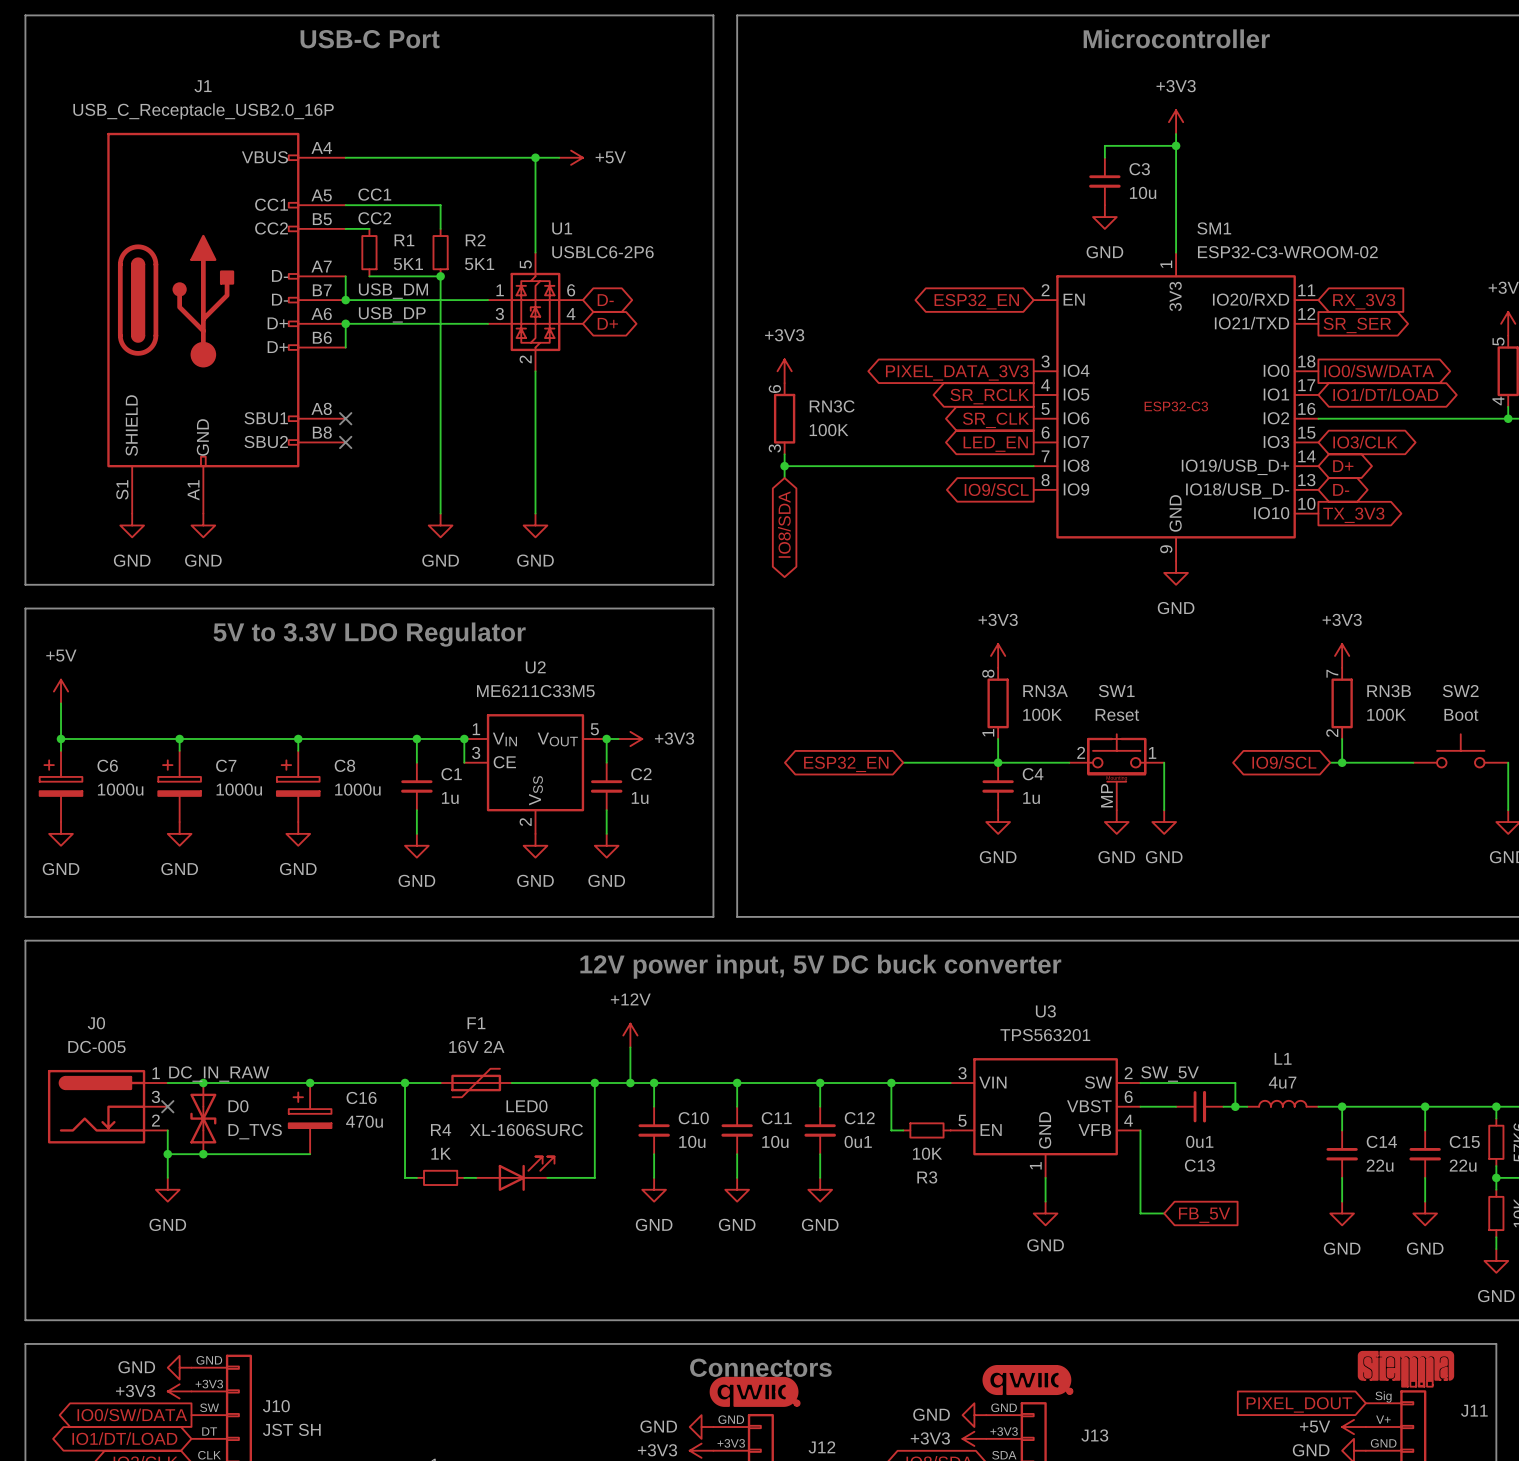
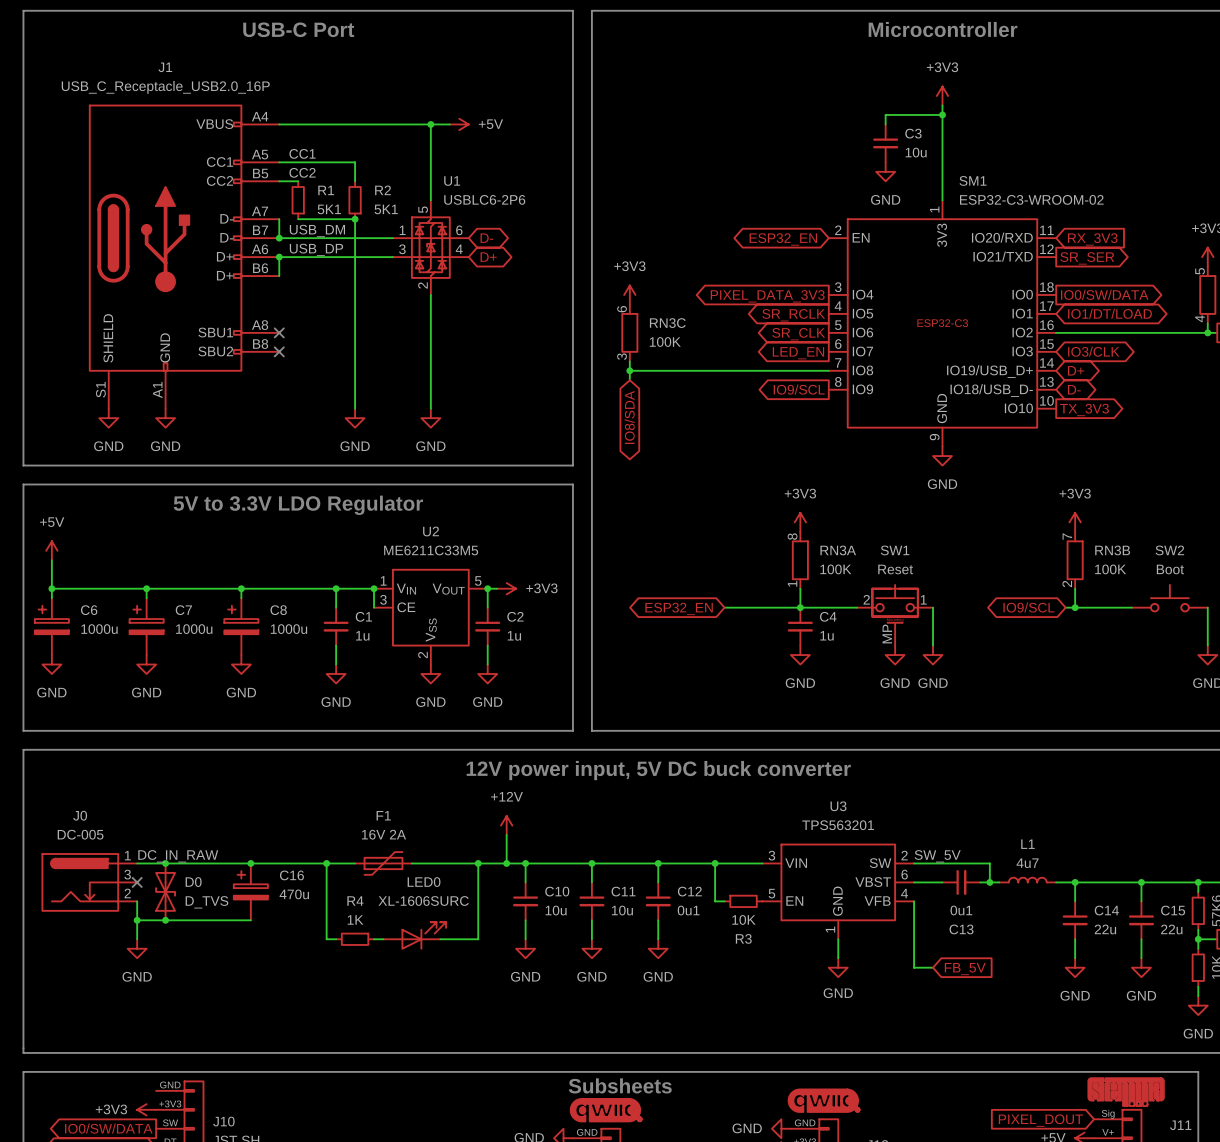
text: none -> Subsheets (620, 1085)
power symbol: GND (179, 1367) -> none
text: Connectors (760, 1367) -> none

